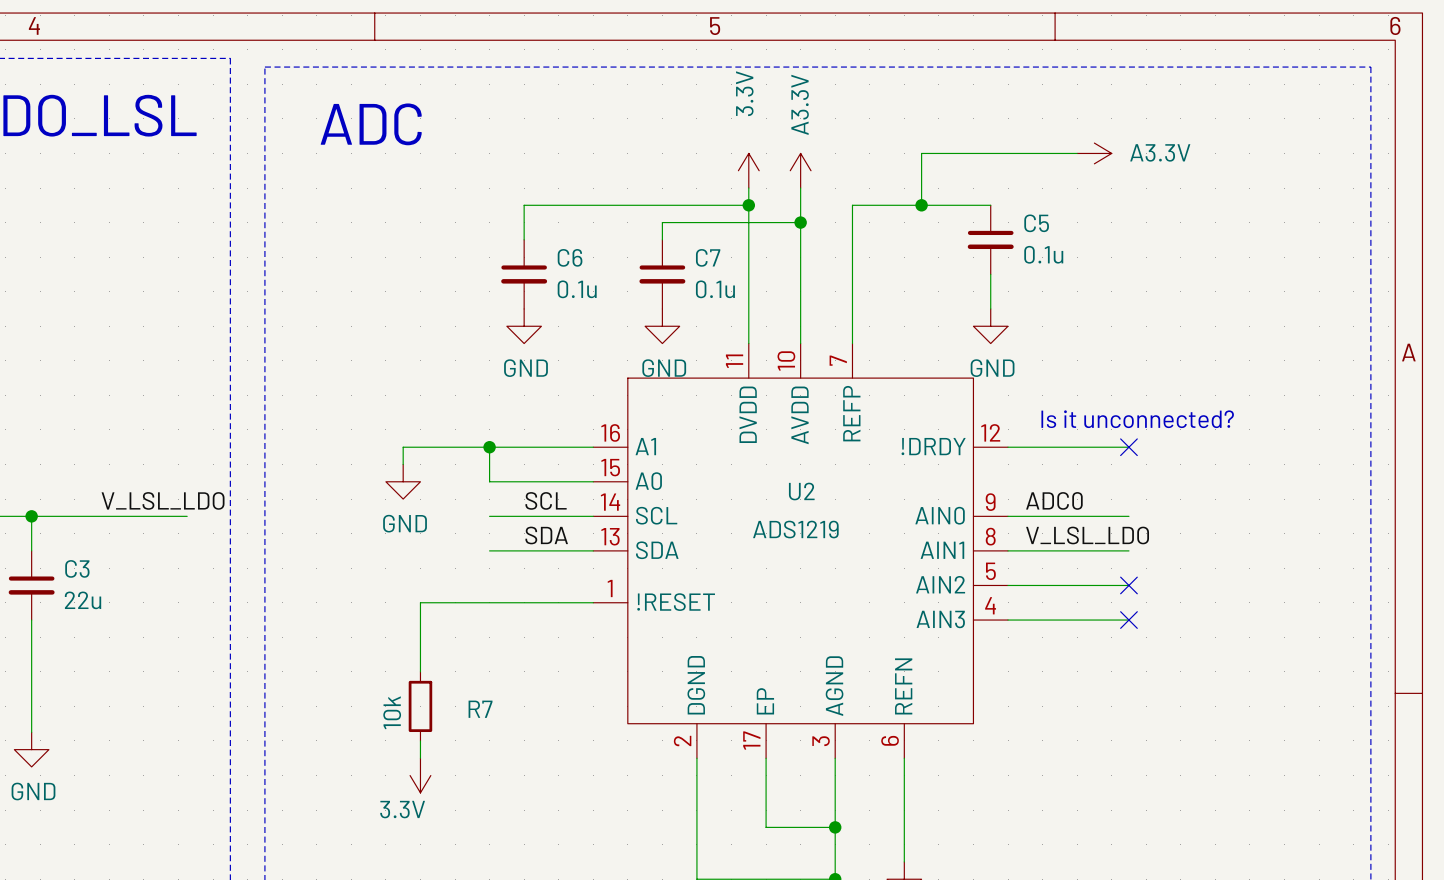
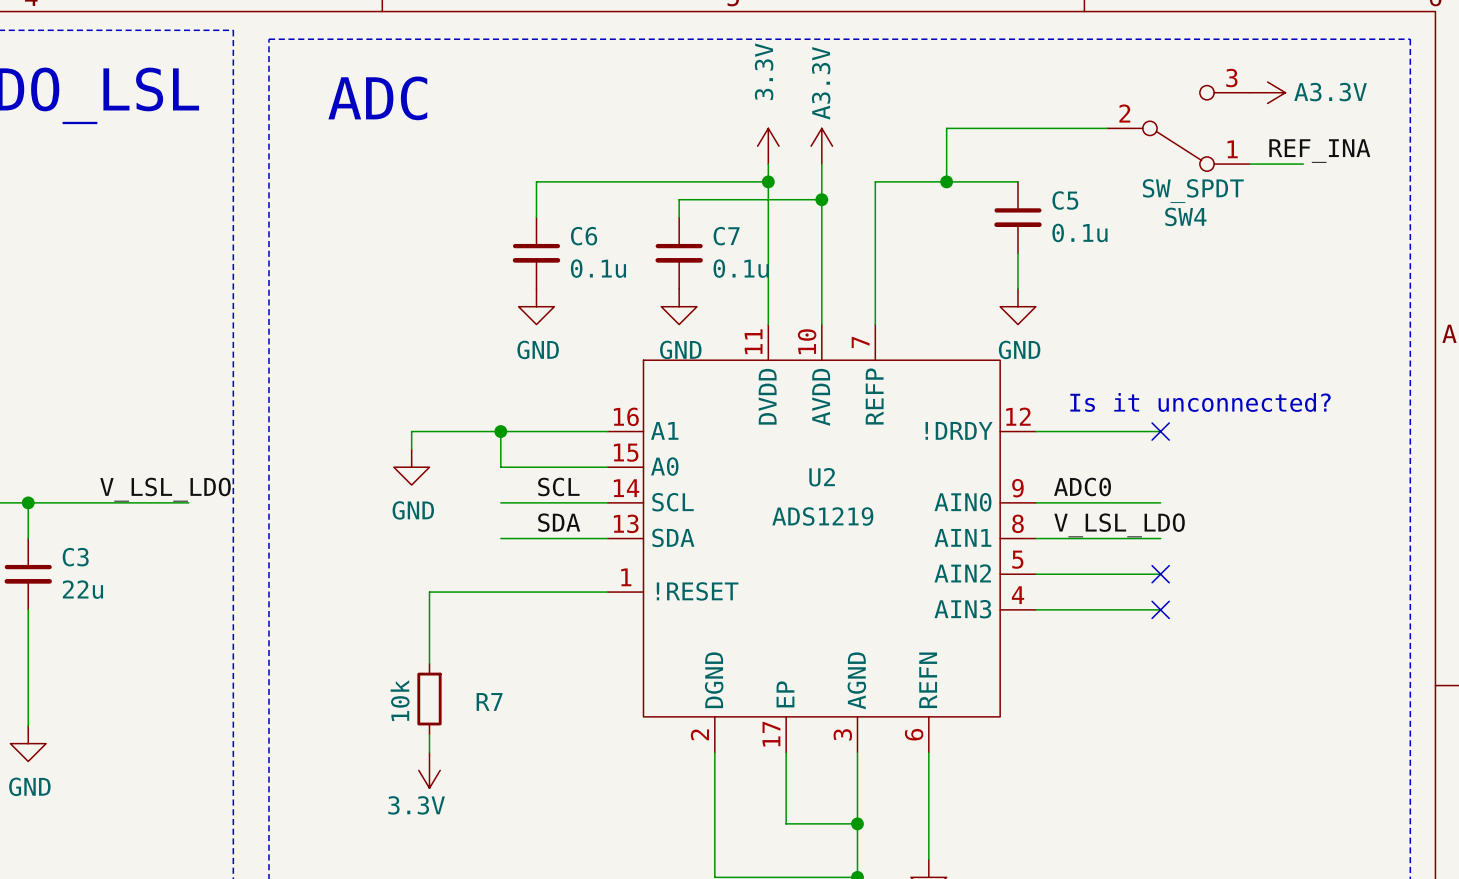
power symbol position: A3.3V (1094, 153) -> A3.3V (1267, 92)
SW4: none -> SW_SPDT (1178, 128)
label: none -> REF_INA (1319, 151)
wire: none -> (1249, 164) (1303, 164)

